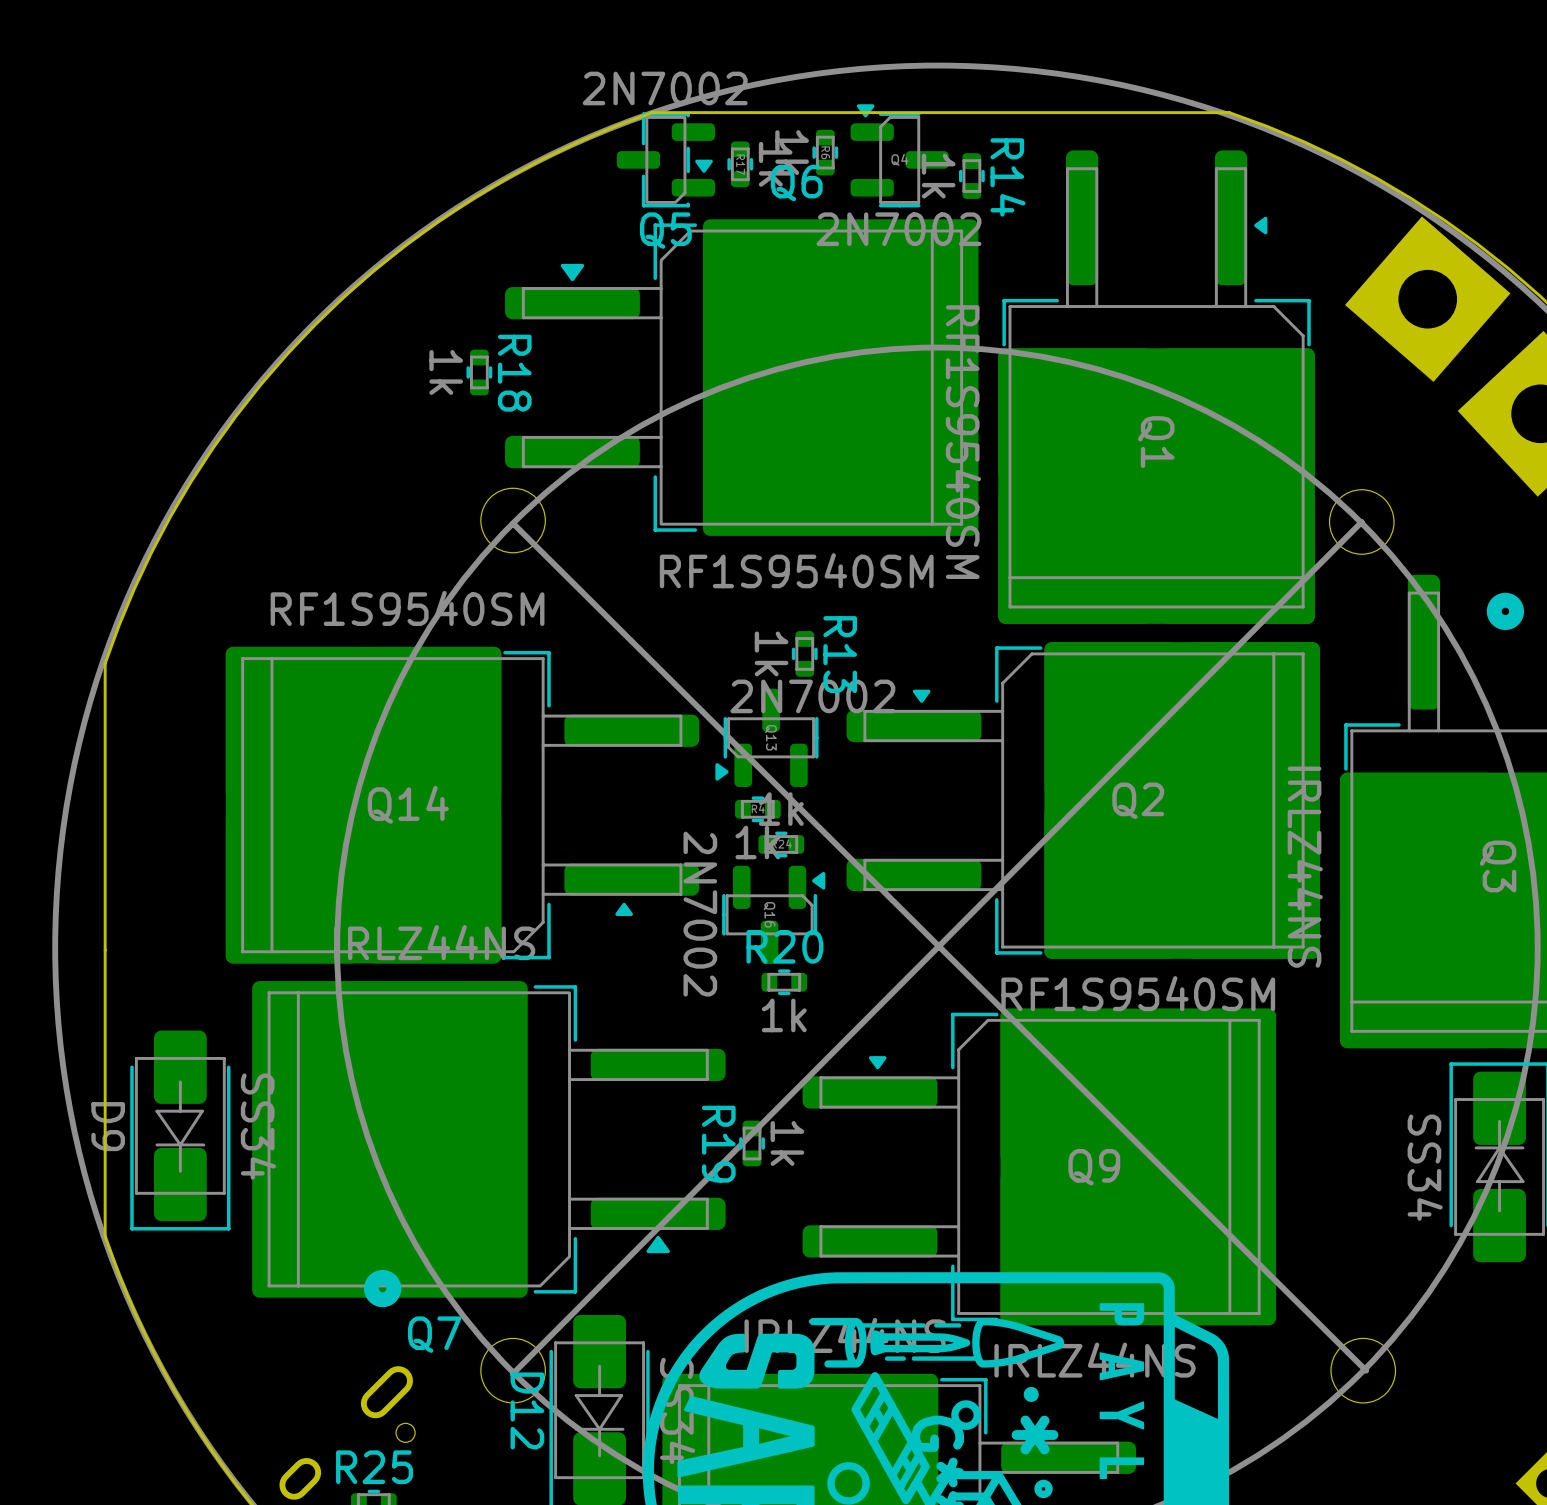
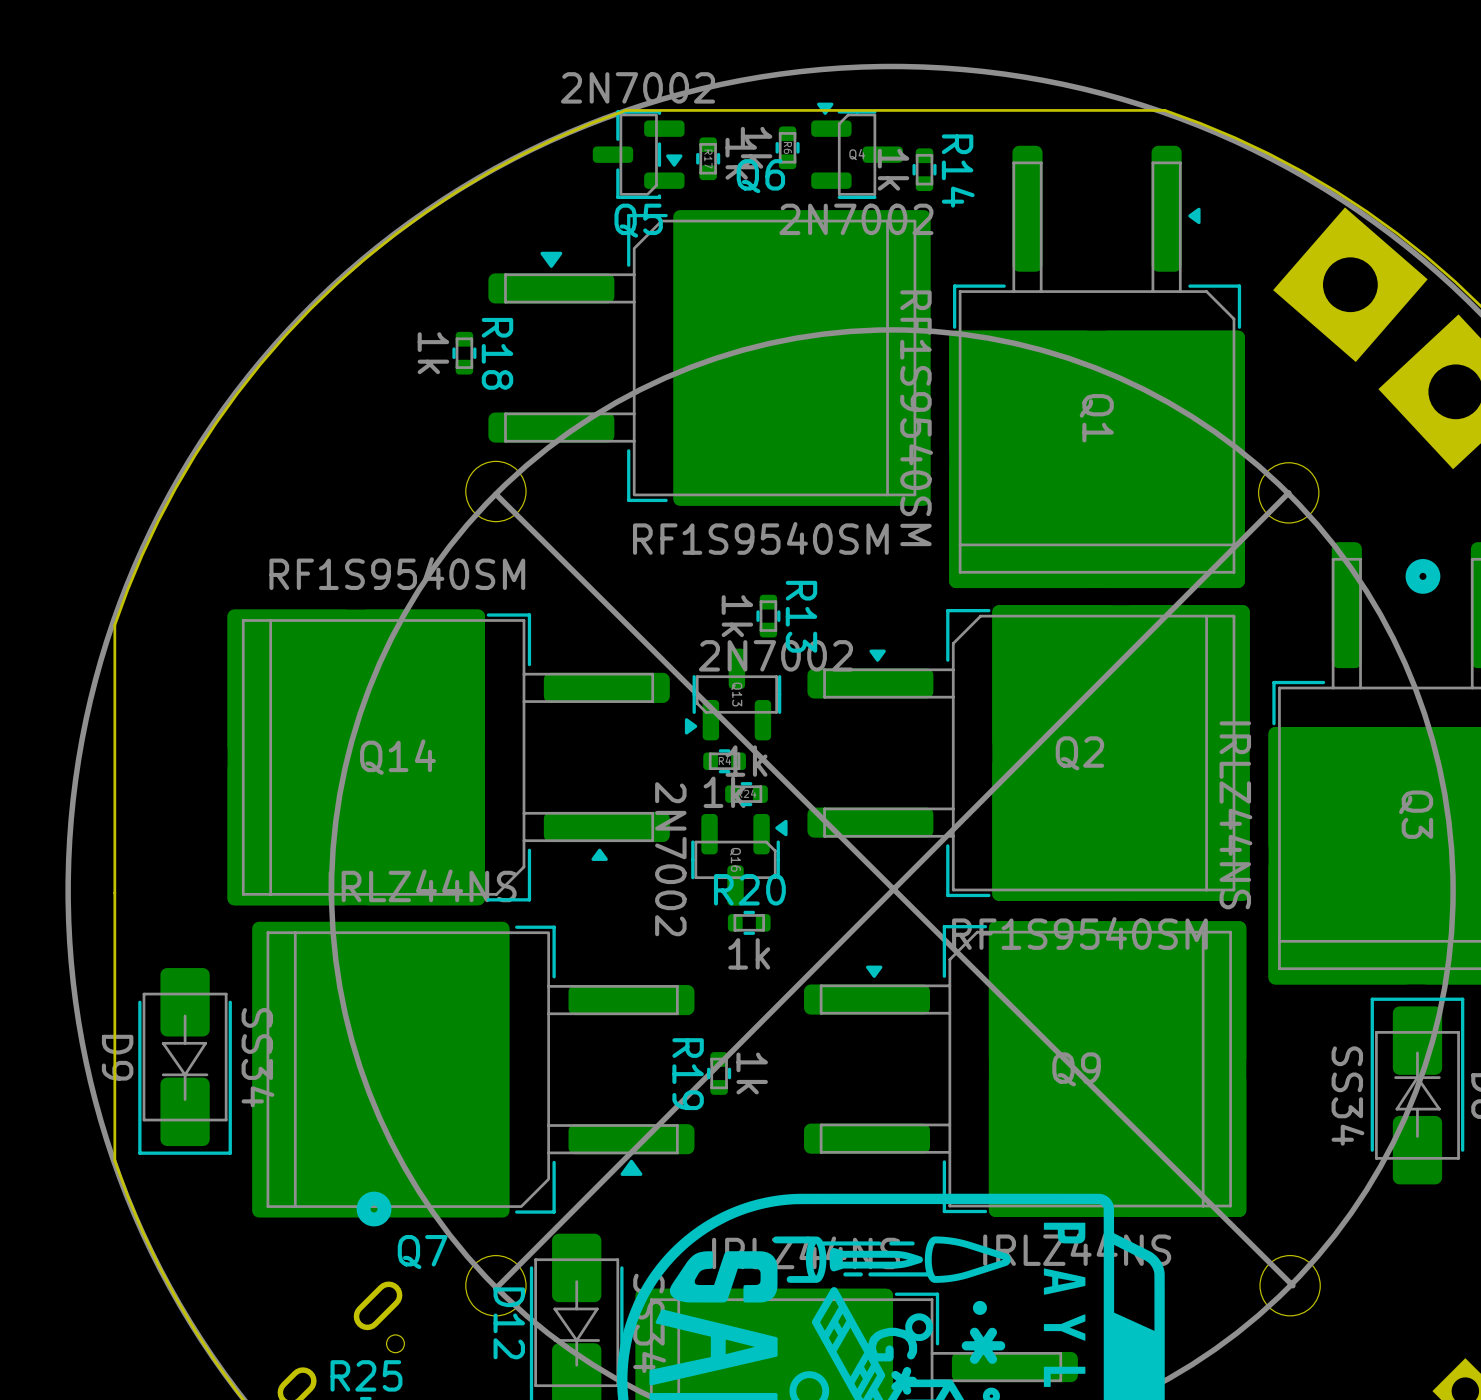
Q9 position: (1039, 1166) -> (1025, 1069)

